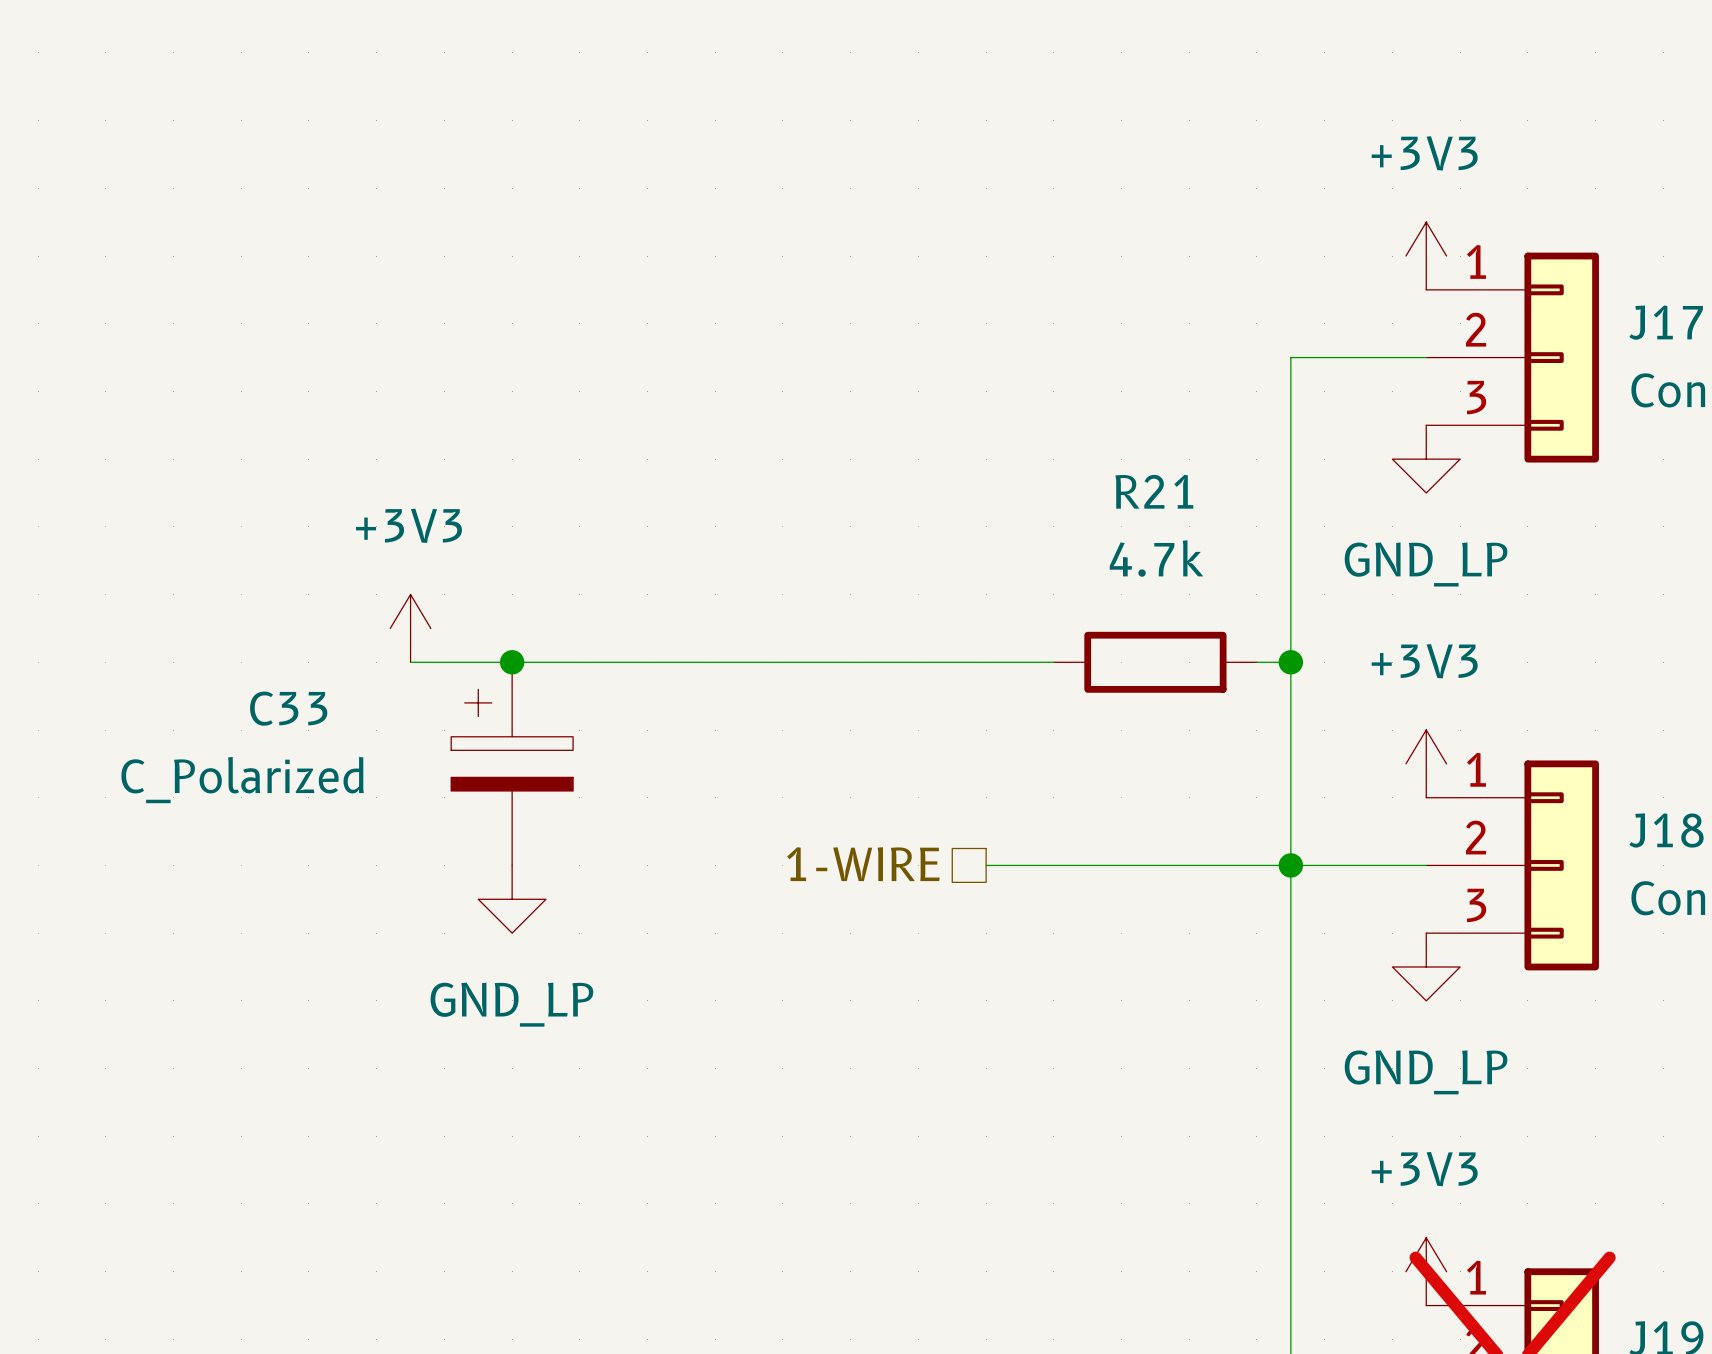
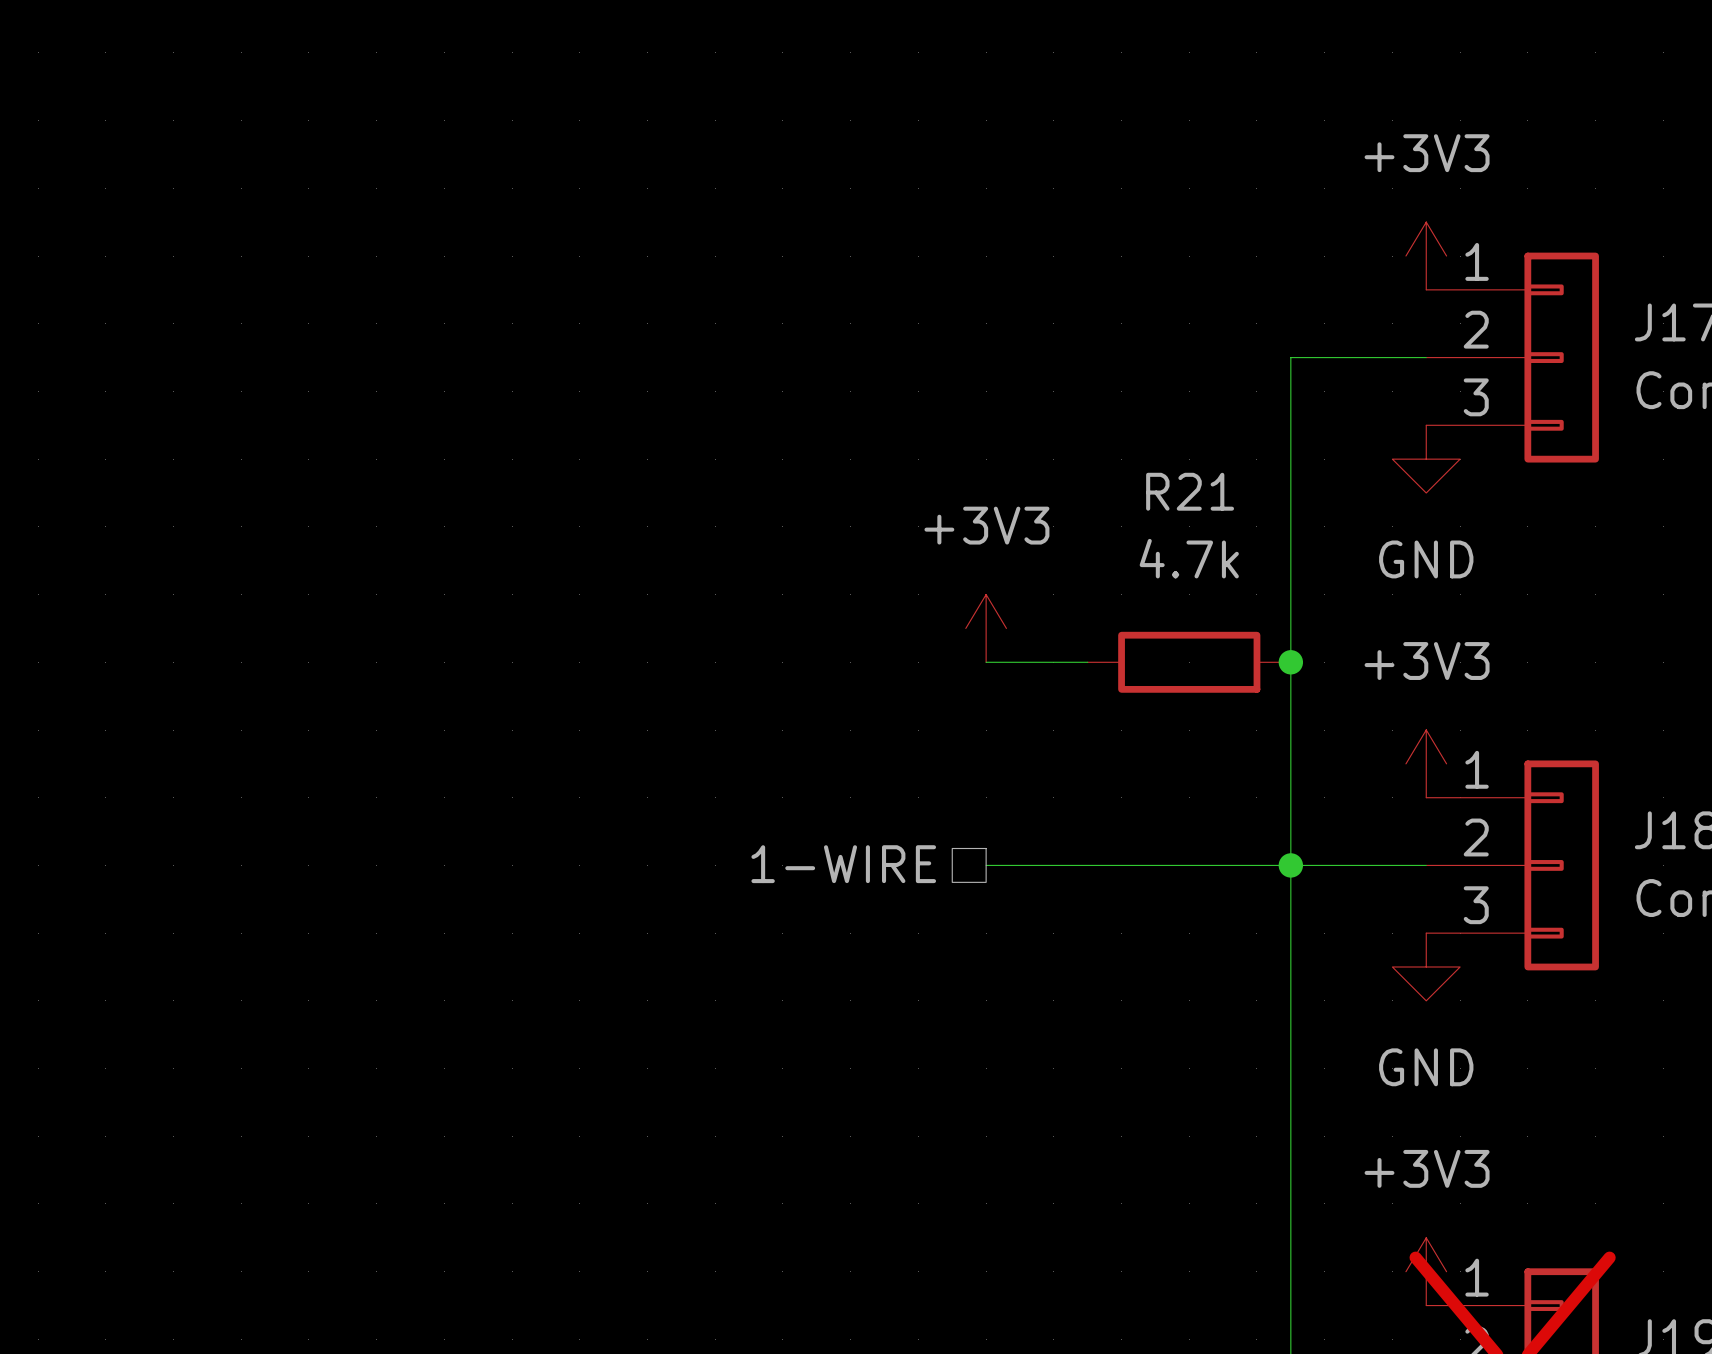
power symbol: GND_LP (1426, 459) -> GND (1426, 459)
power symbol position: +3V3 (410, 628) -> +3V3 (986, 628)
wire: (410, 662) (986, 662) -> none
junction: (512, 662) -> none
R21 position: (1155, 662) -> (1189, 662)
C33: C_Polarized (512, 763) -> none
power symbol: GND_LP (512, 899) -> none
power symbol: GND_LP (1426, 967) -> GND (1426, 967)

